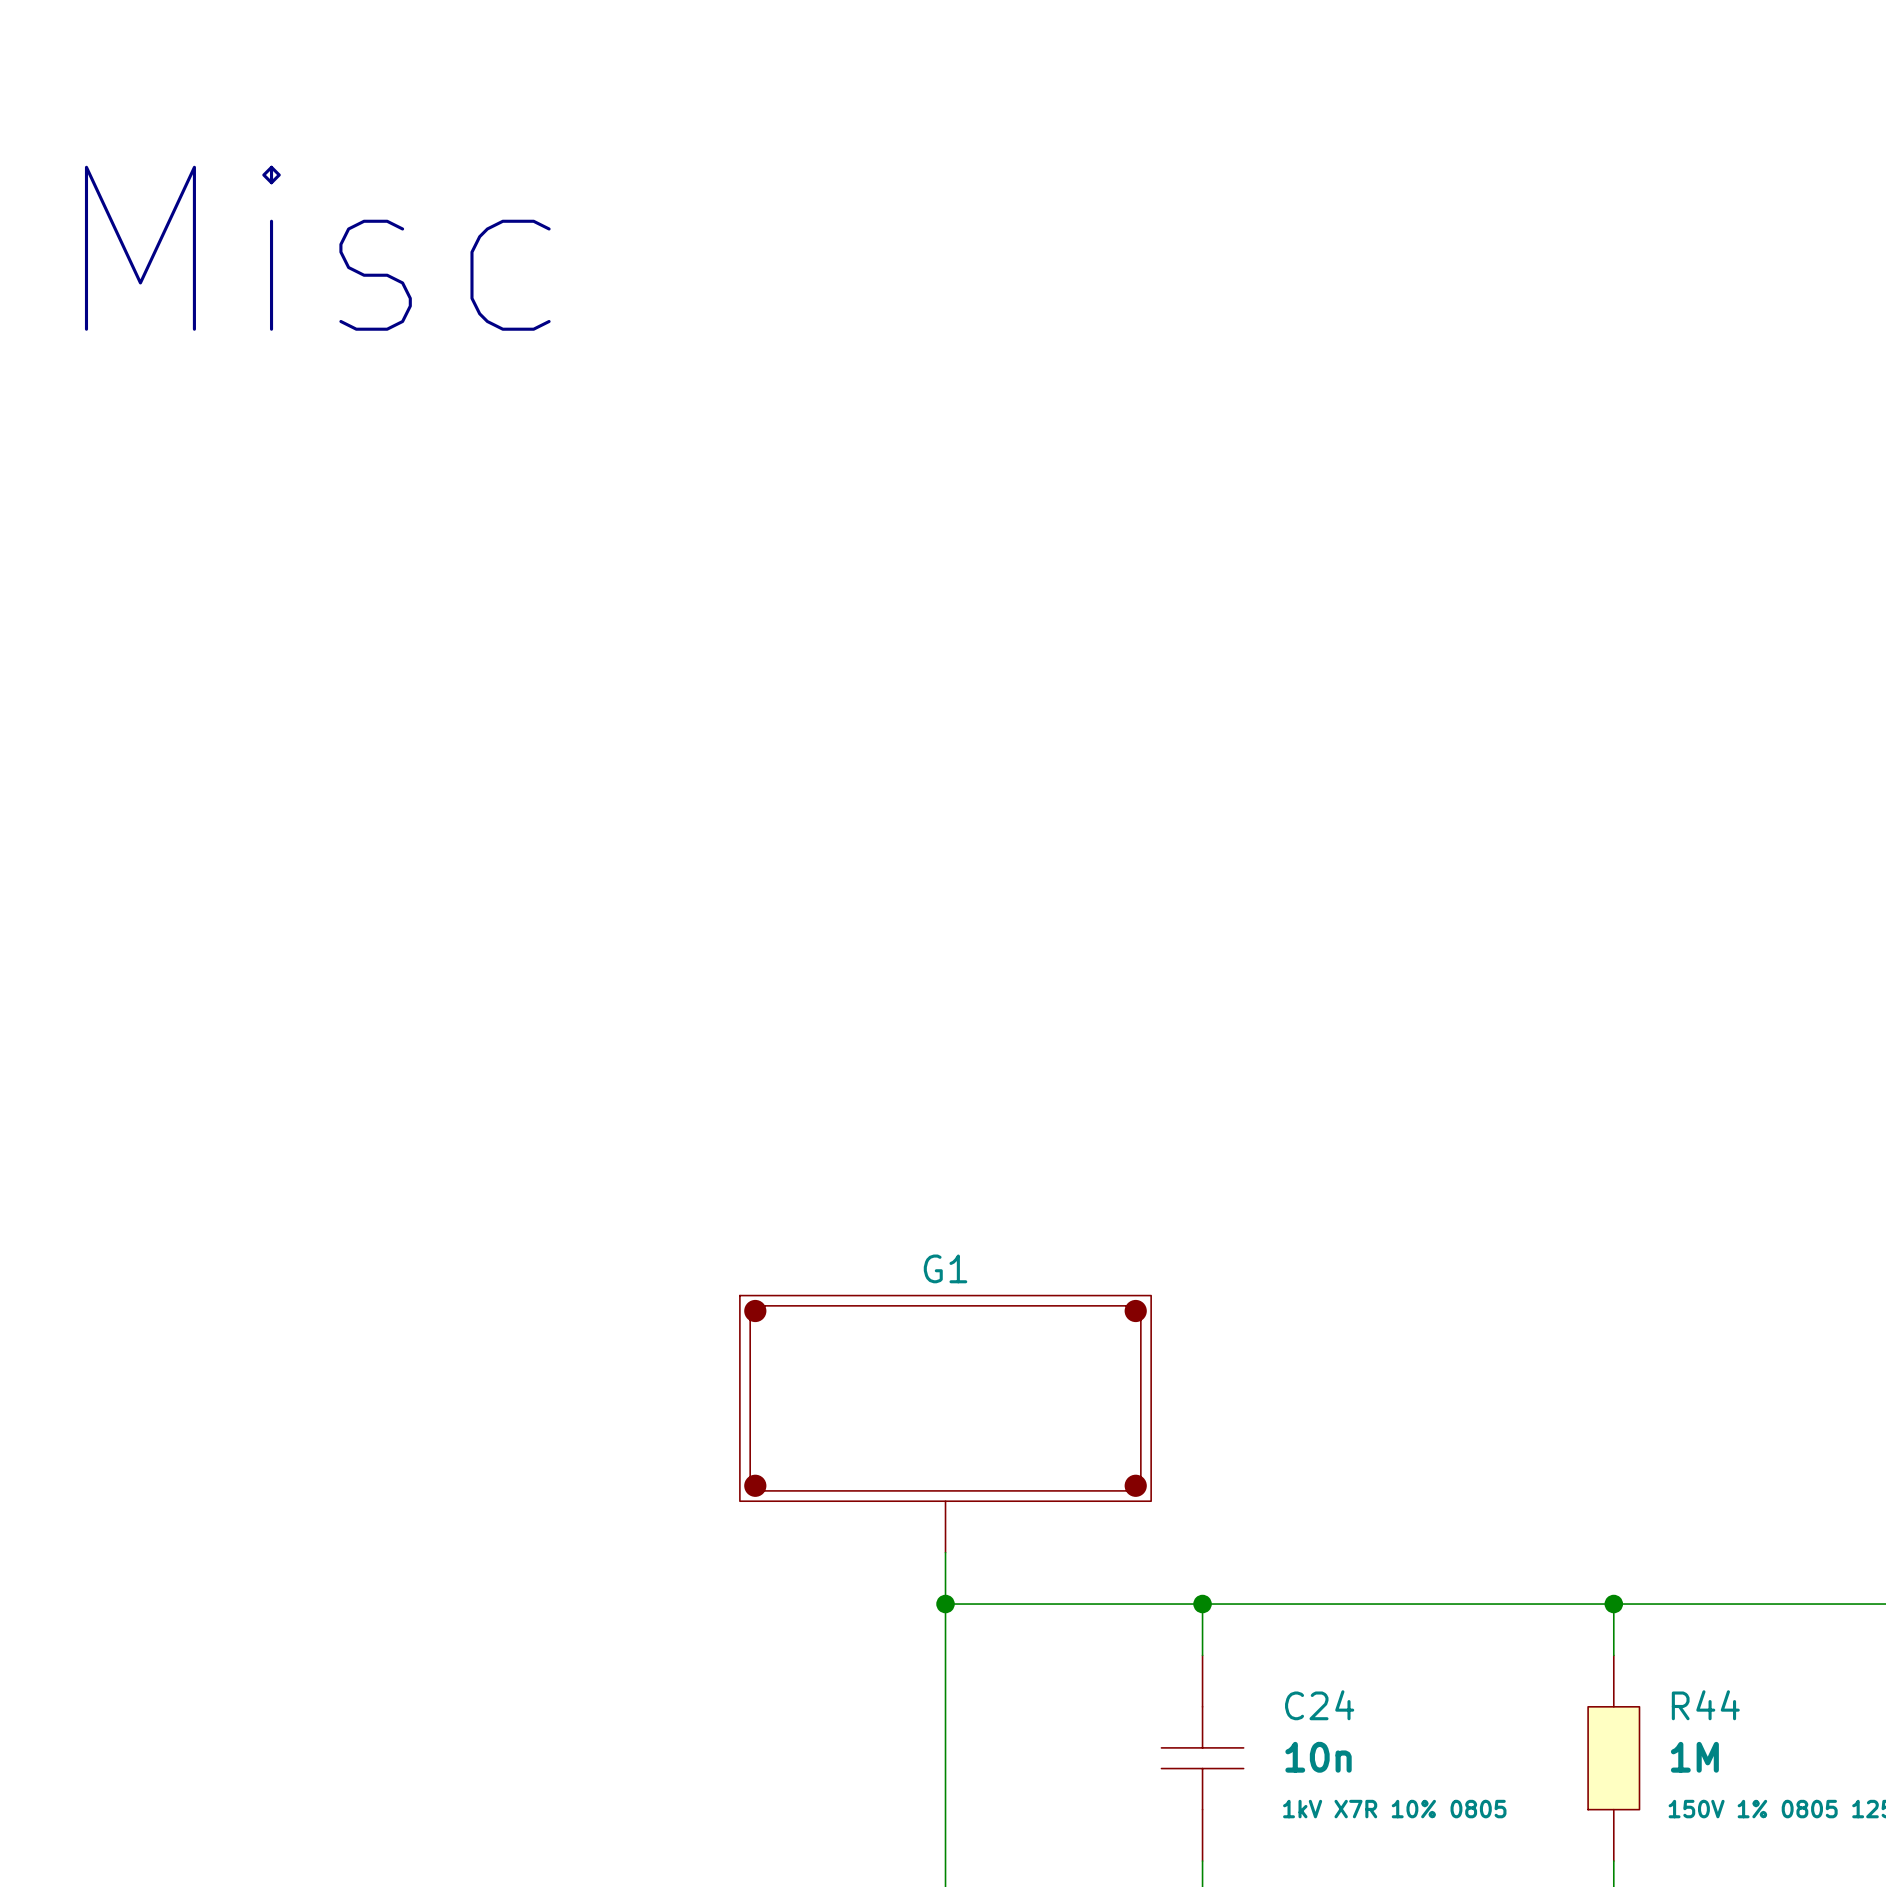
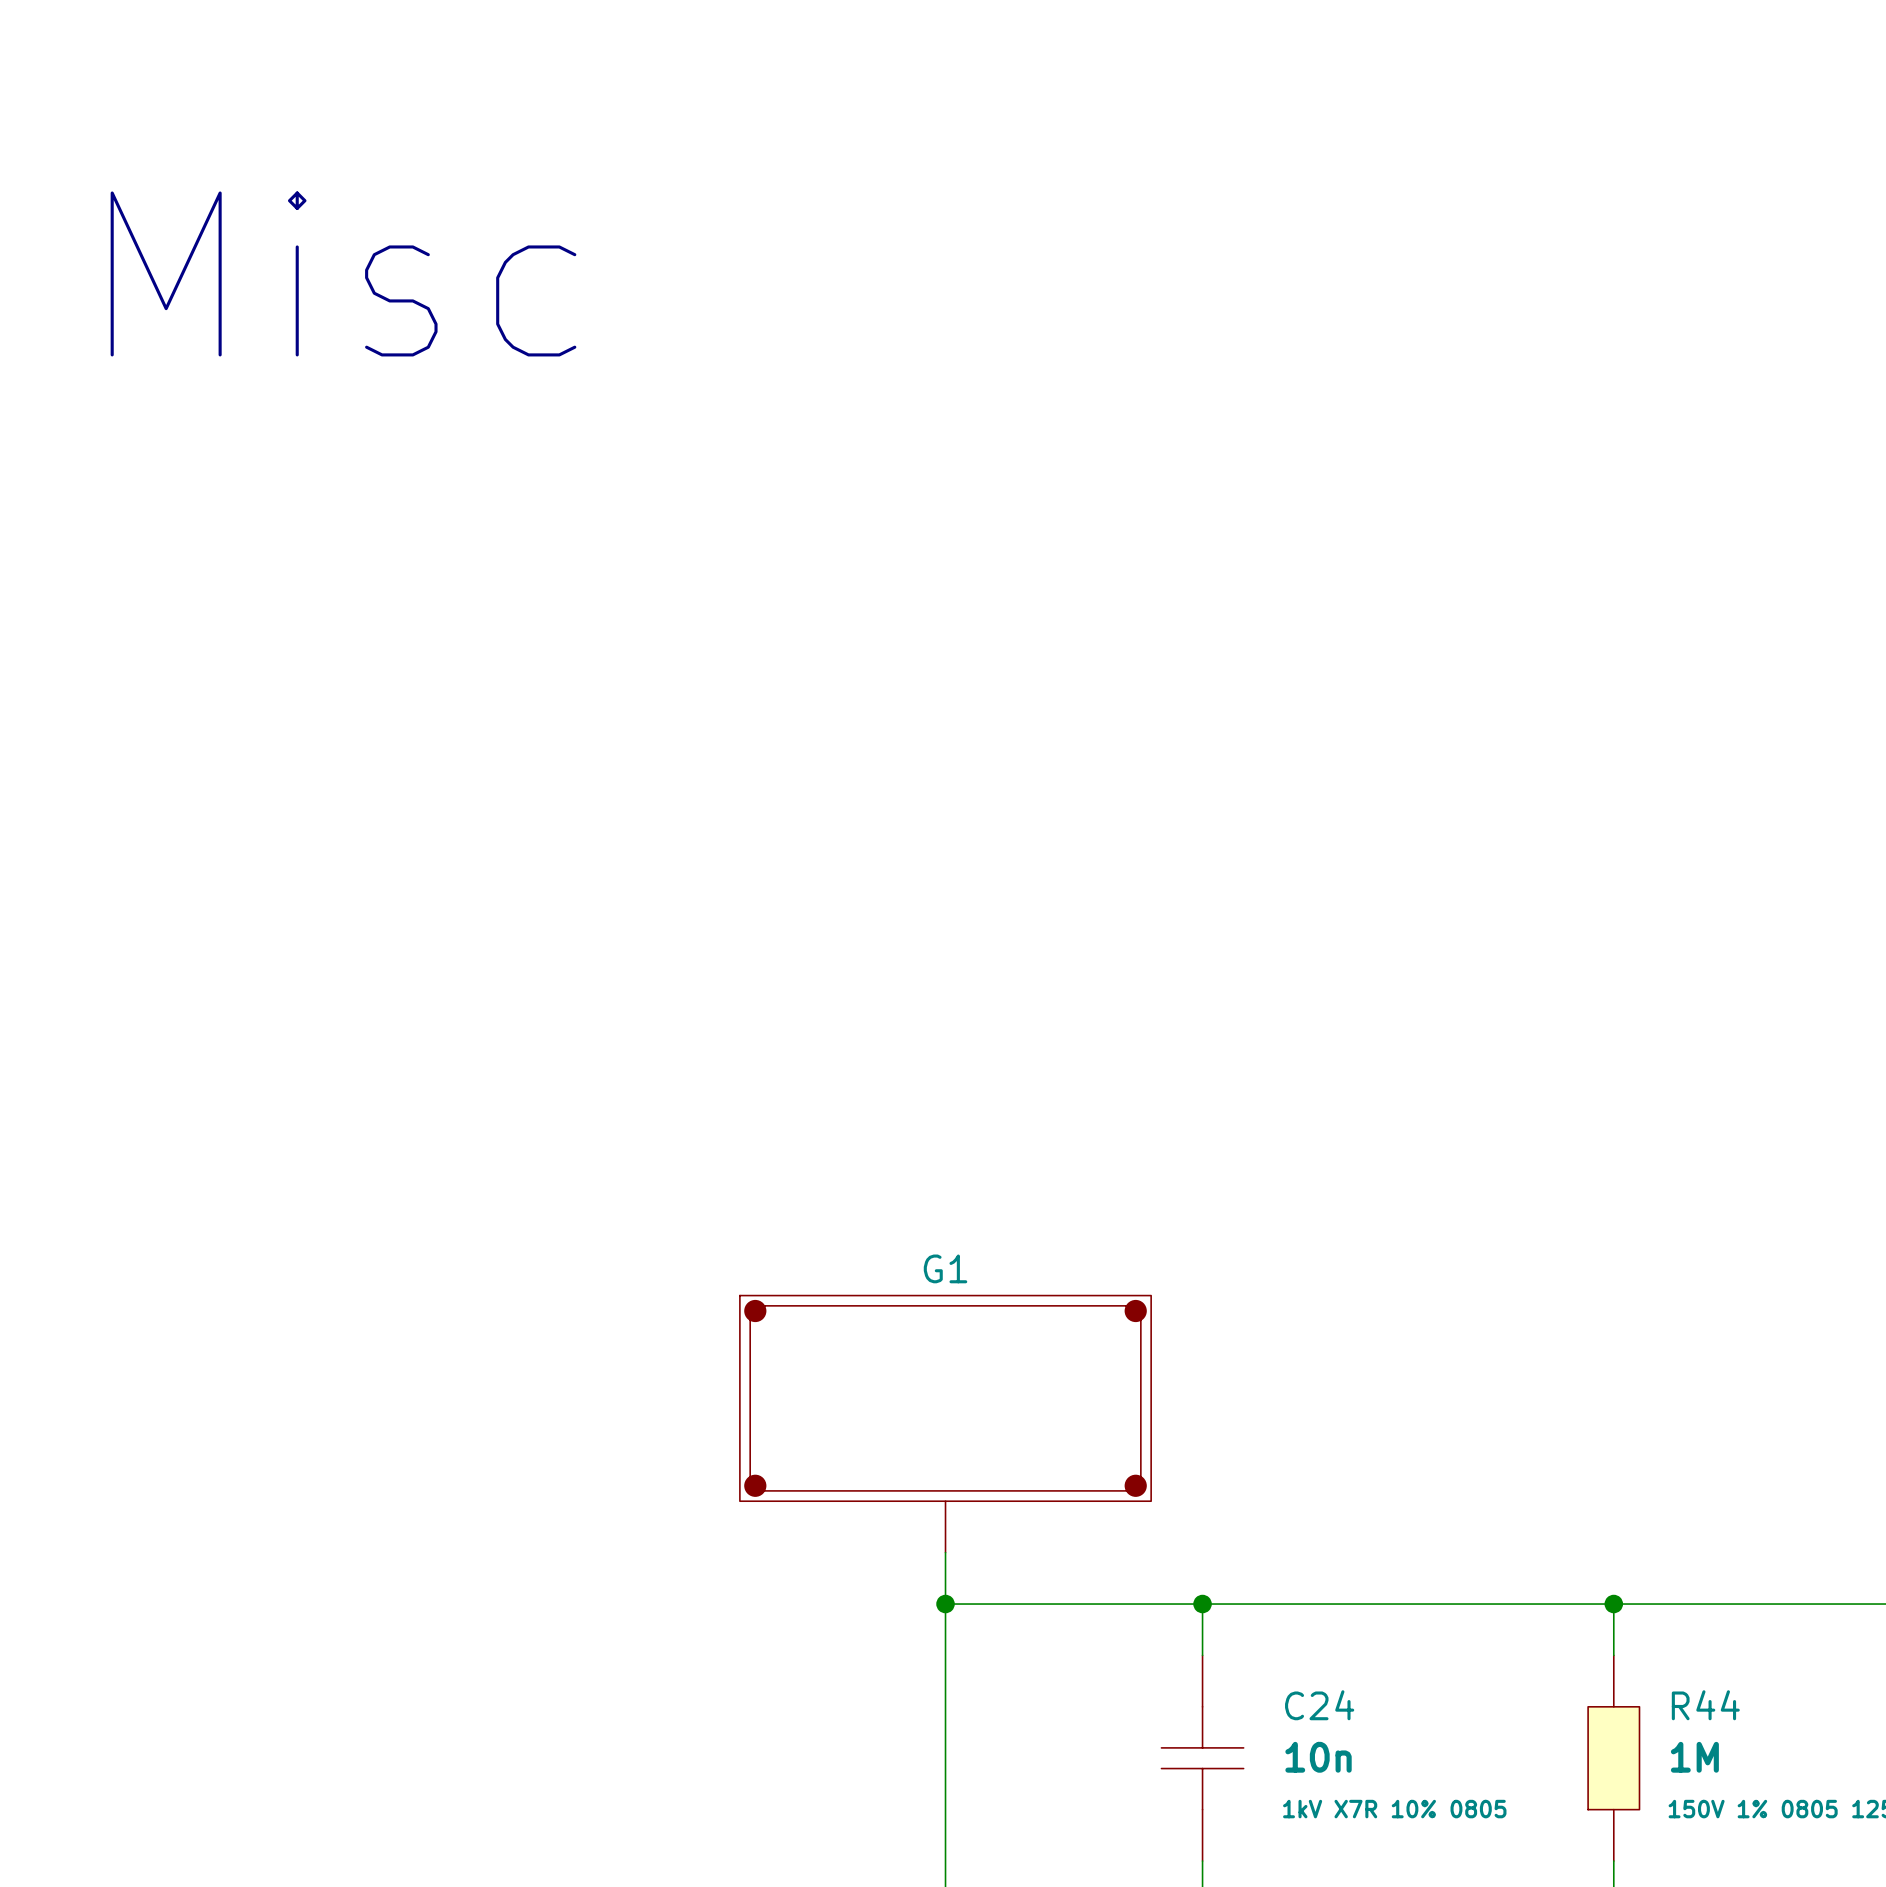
text position: Misc (317, 248) -> Misc (343, 273)

